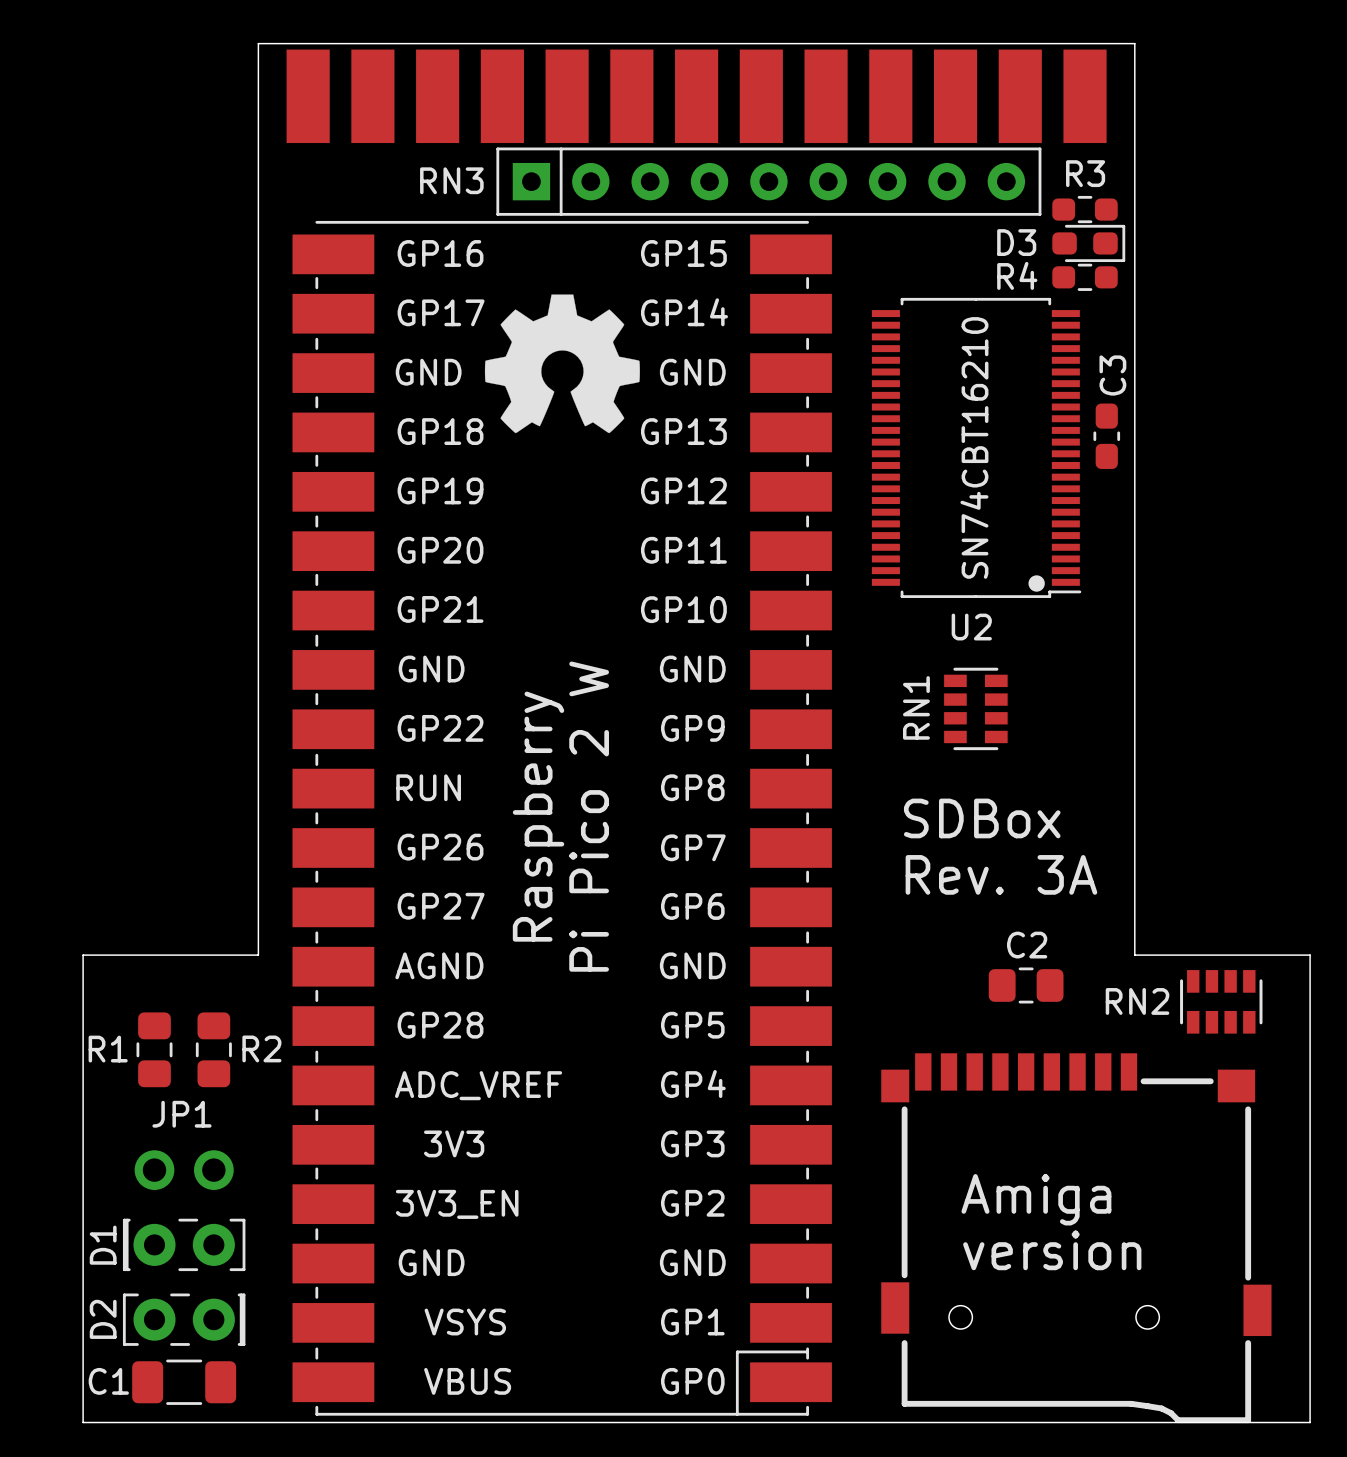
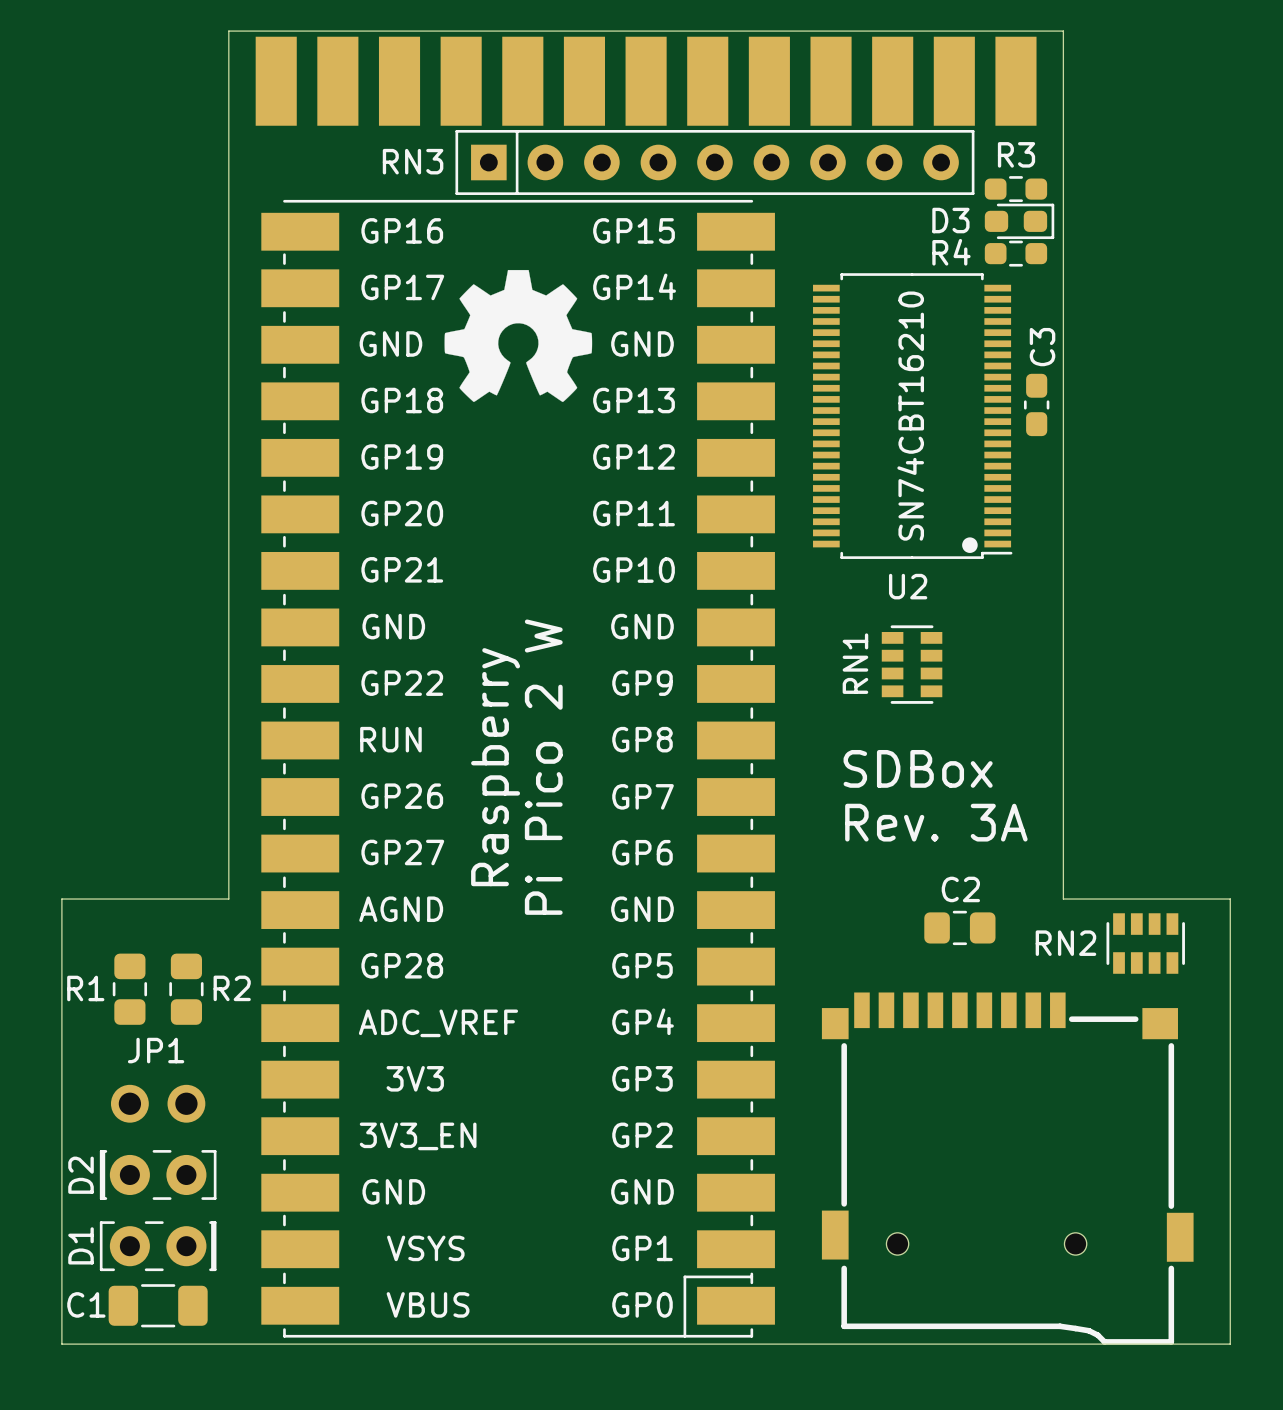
text: Amiga (1036, 1199) -> none
D1 name: D1 (103, 1245) -> D2 (81, 1175)
text: version (1052, 1250) -> none
D2 name: D2 (103, 1319) -> D1 (81, 1245)

